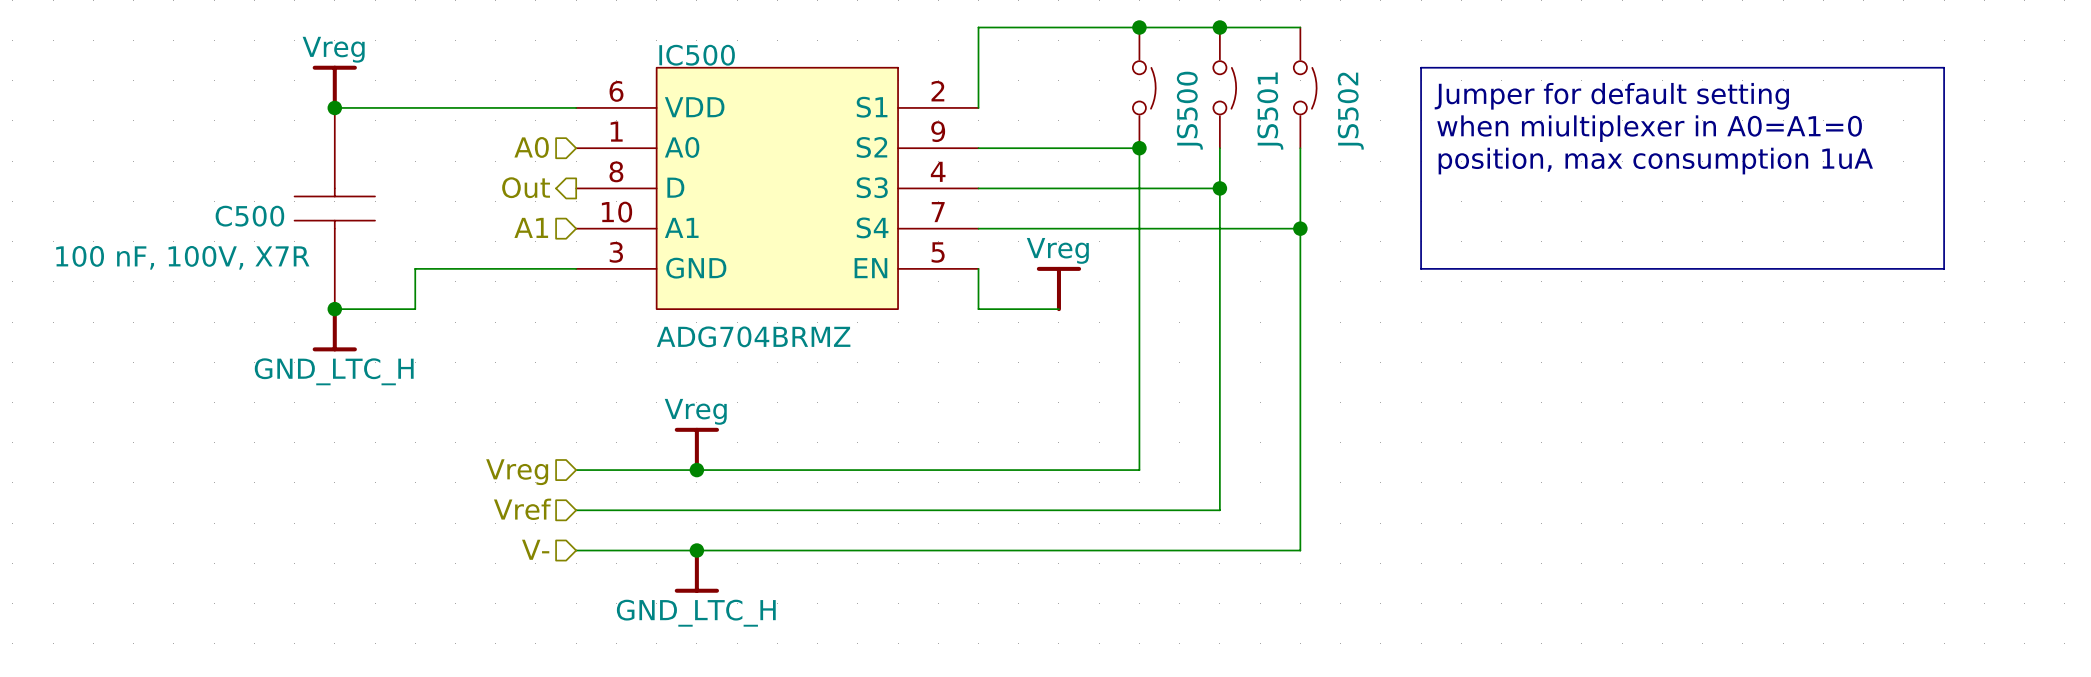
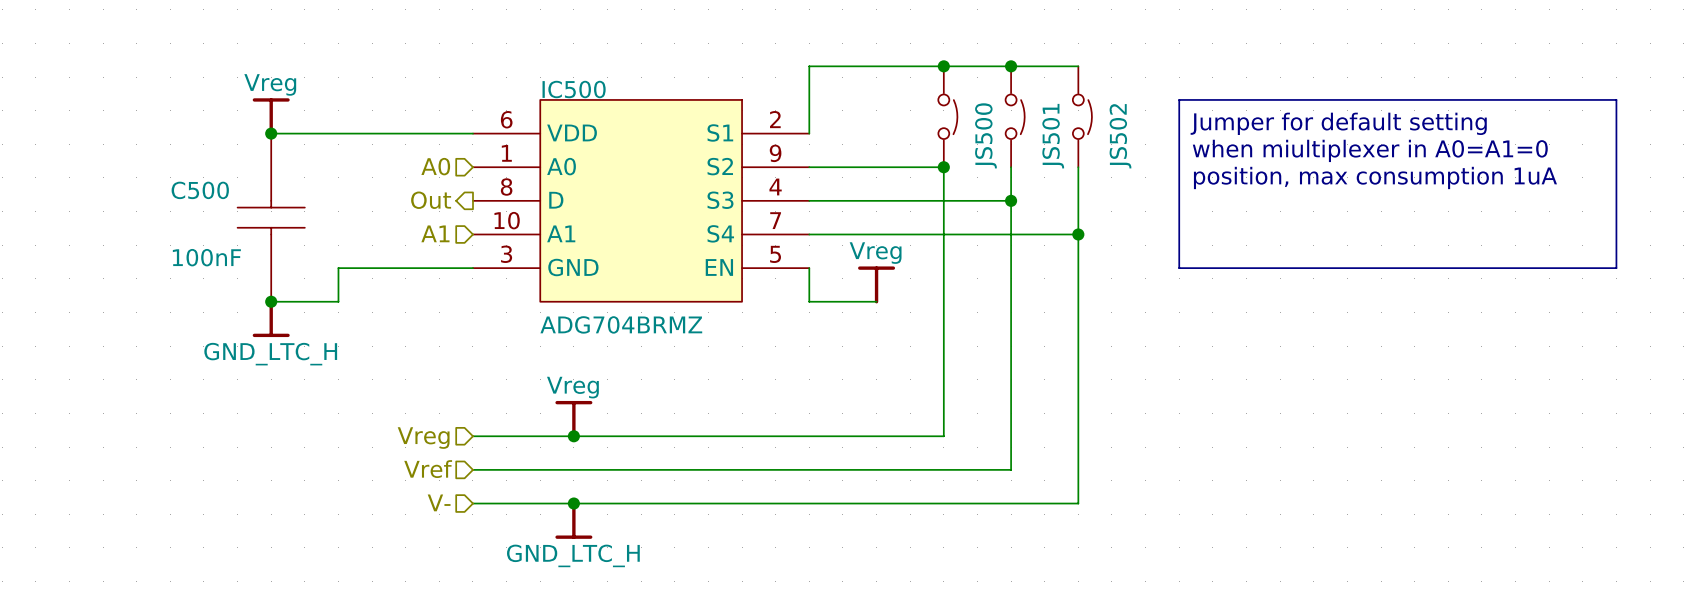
C500 name position: C500 (249, 216) -> C500 (200, 190)
C500 text: none -> 100nF (206, 257)
C500 value: 100 nF, 100V, X7R (182, 257) -> none

